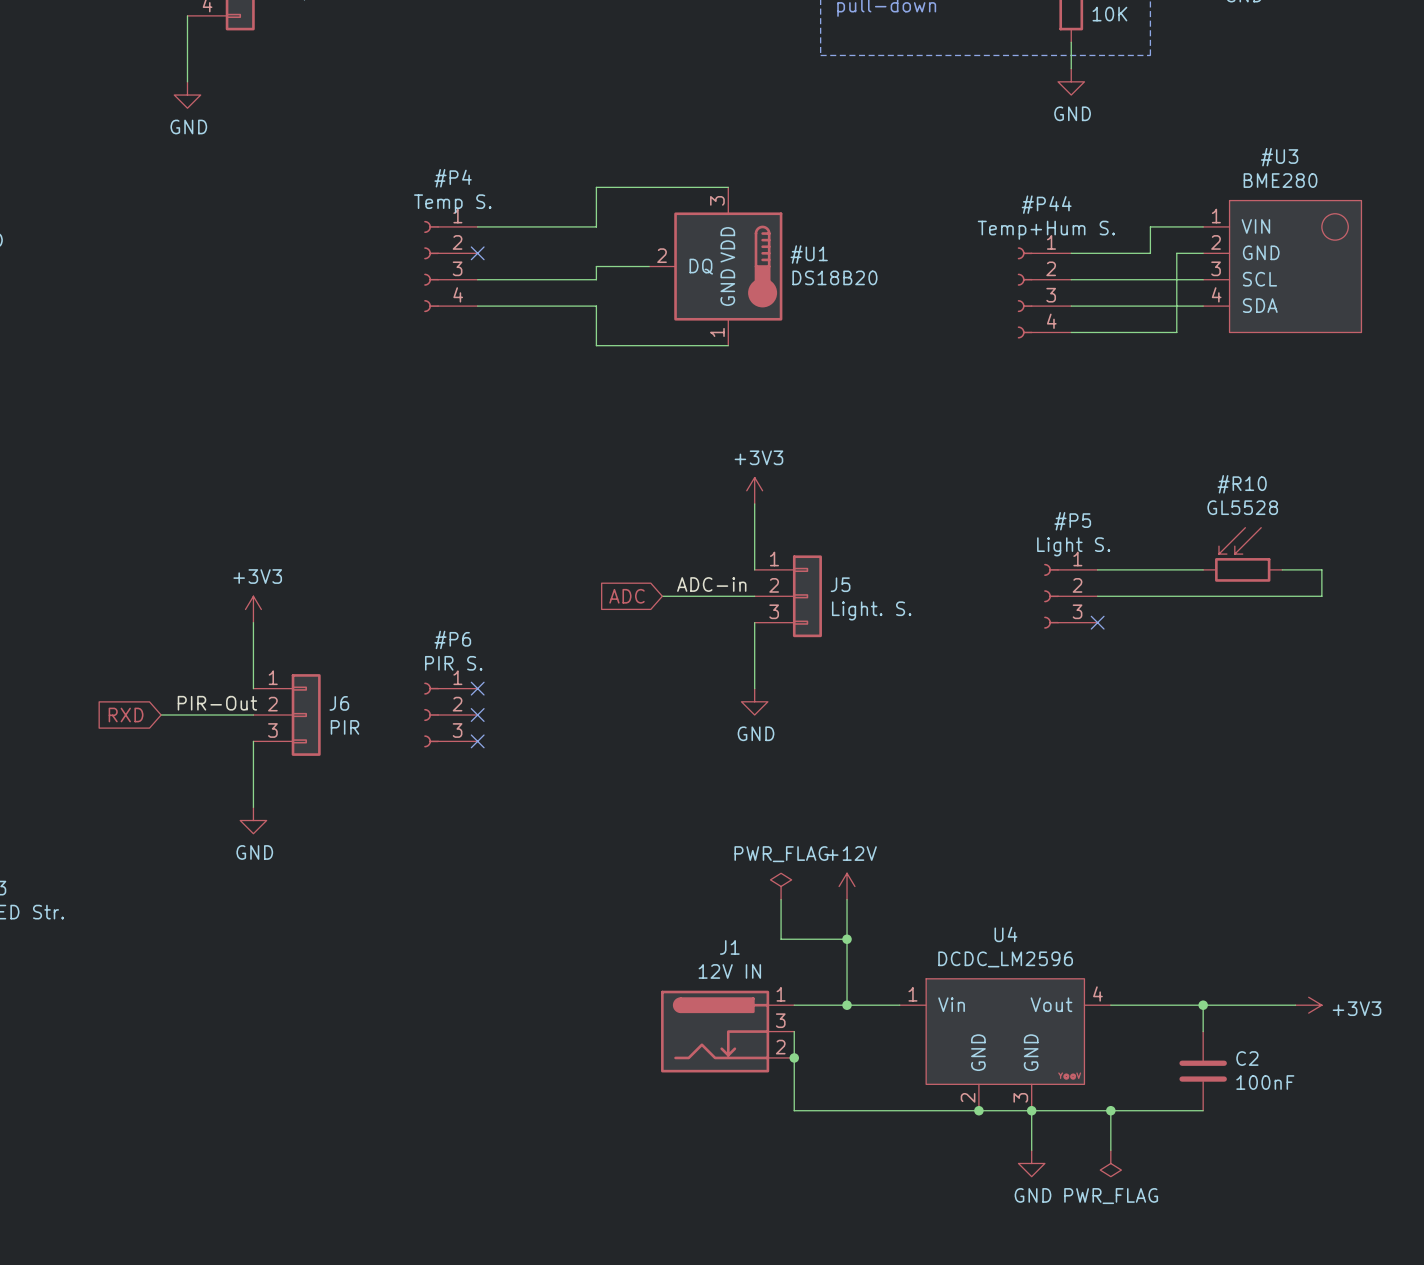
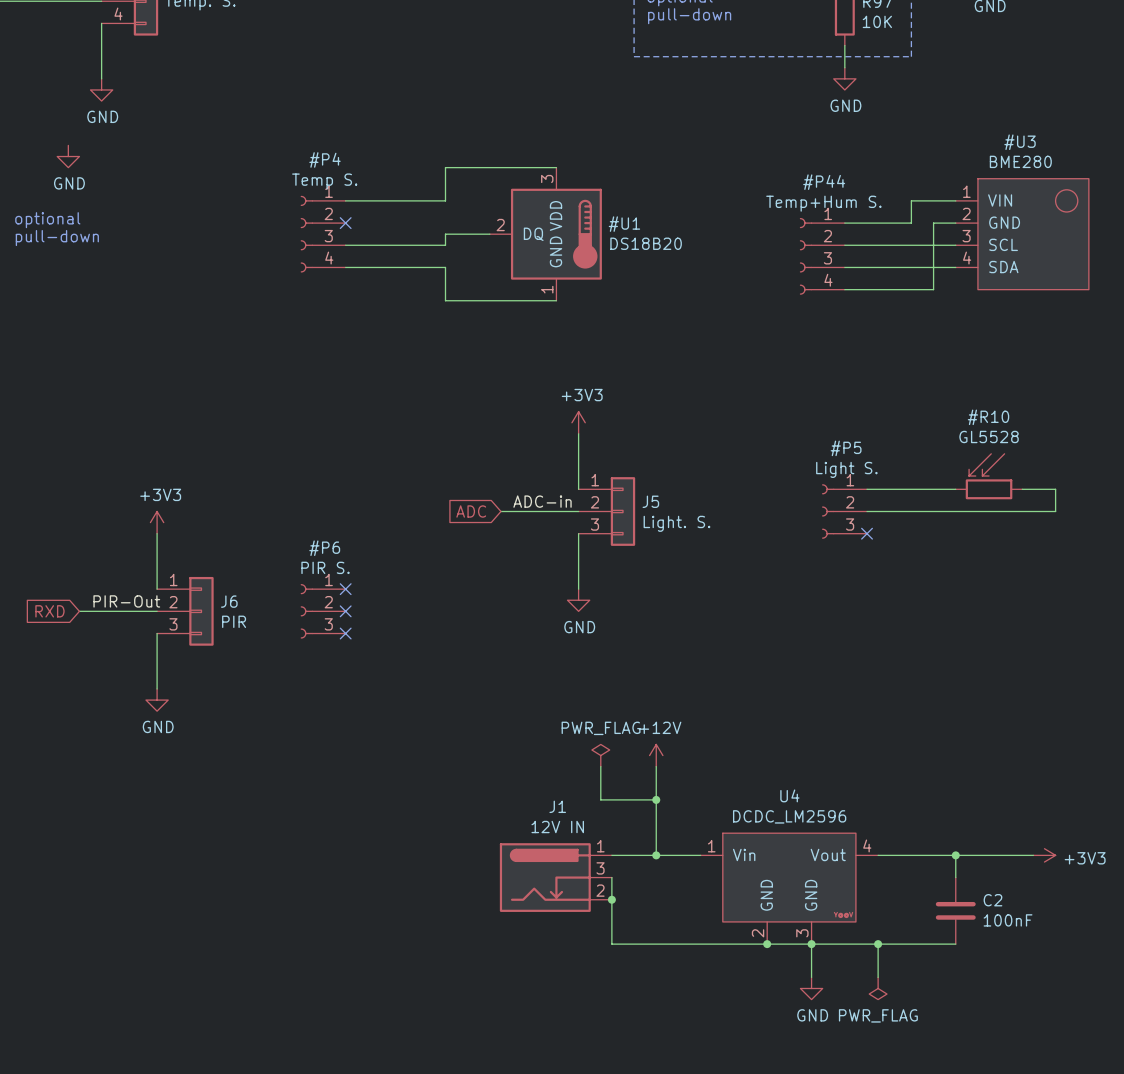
power symbol: none -> GND (68, 156)
text: none -> optional (47, 220)
text: none -> pull-down (57, 238)

